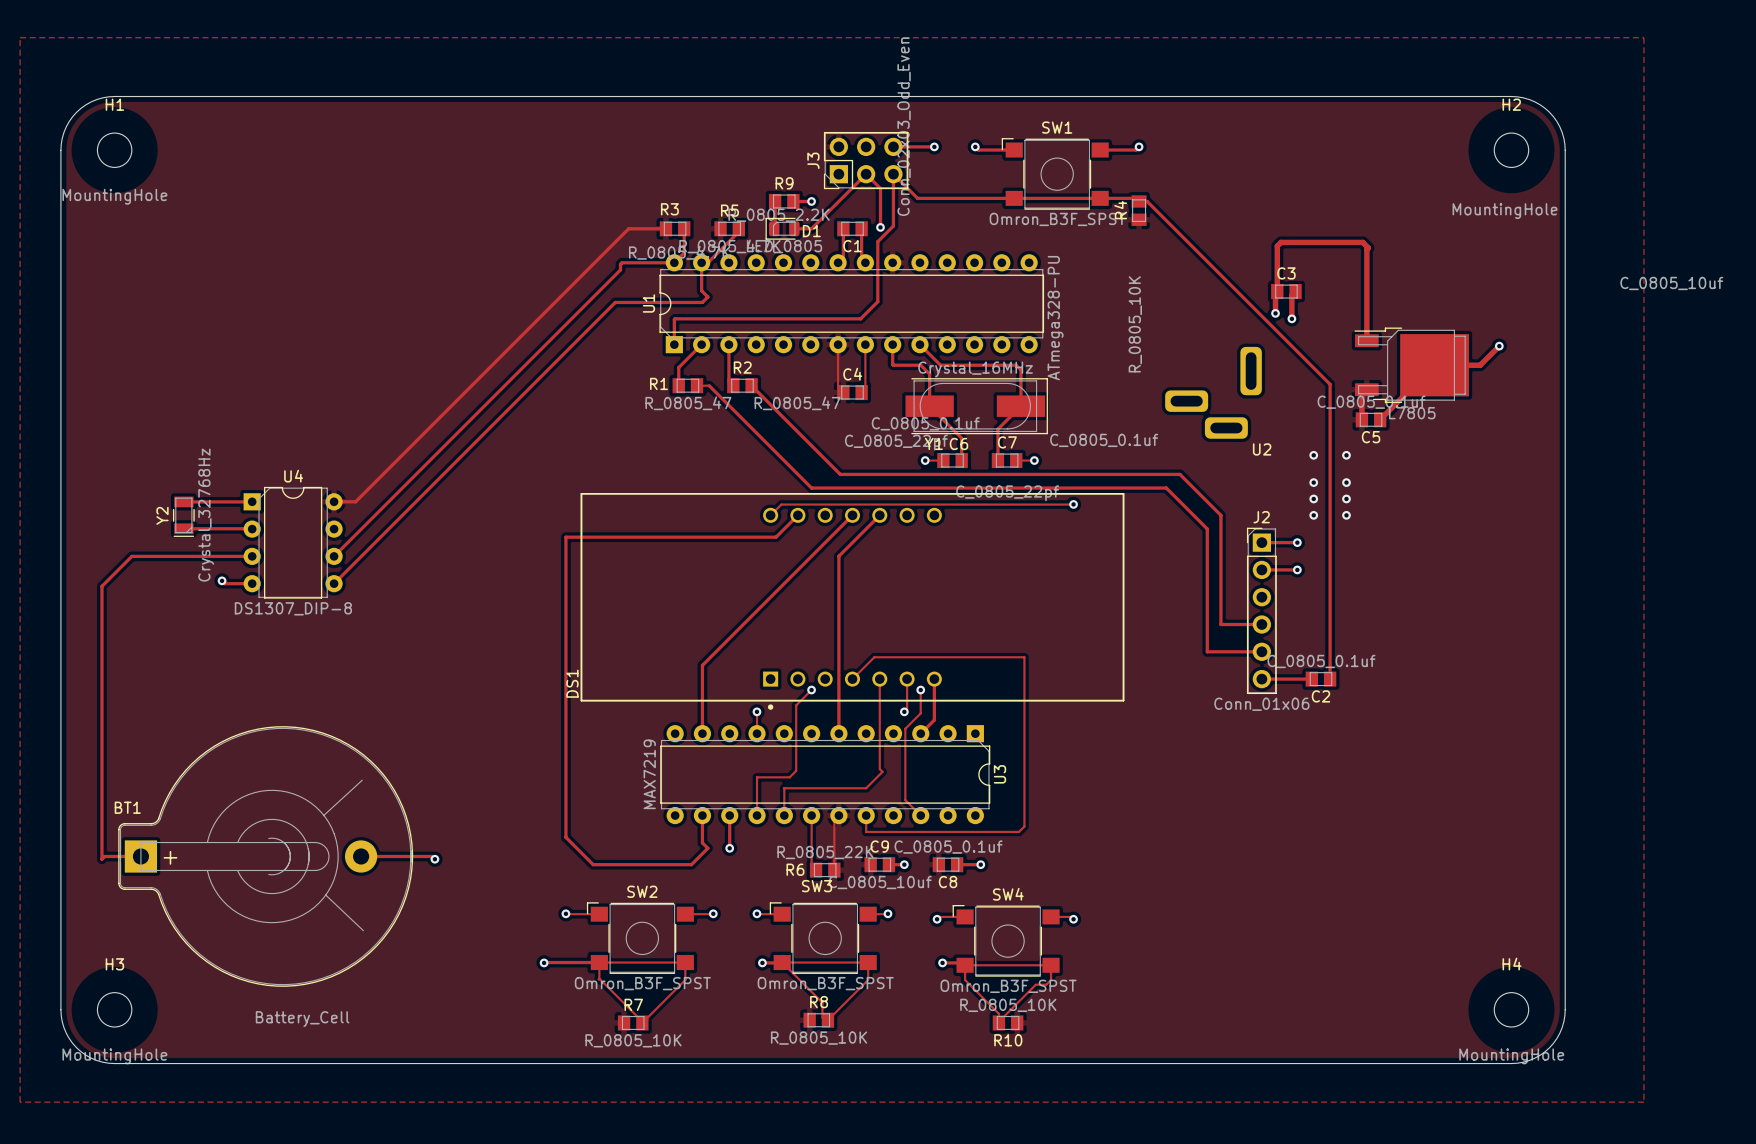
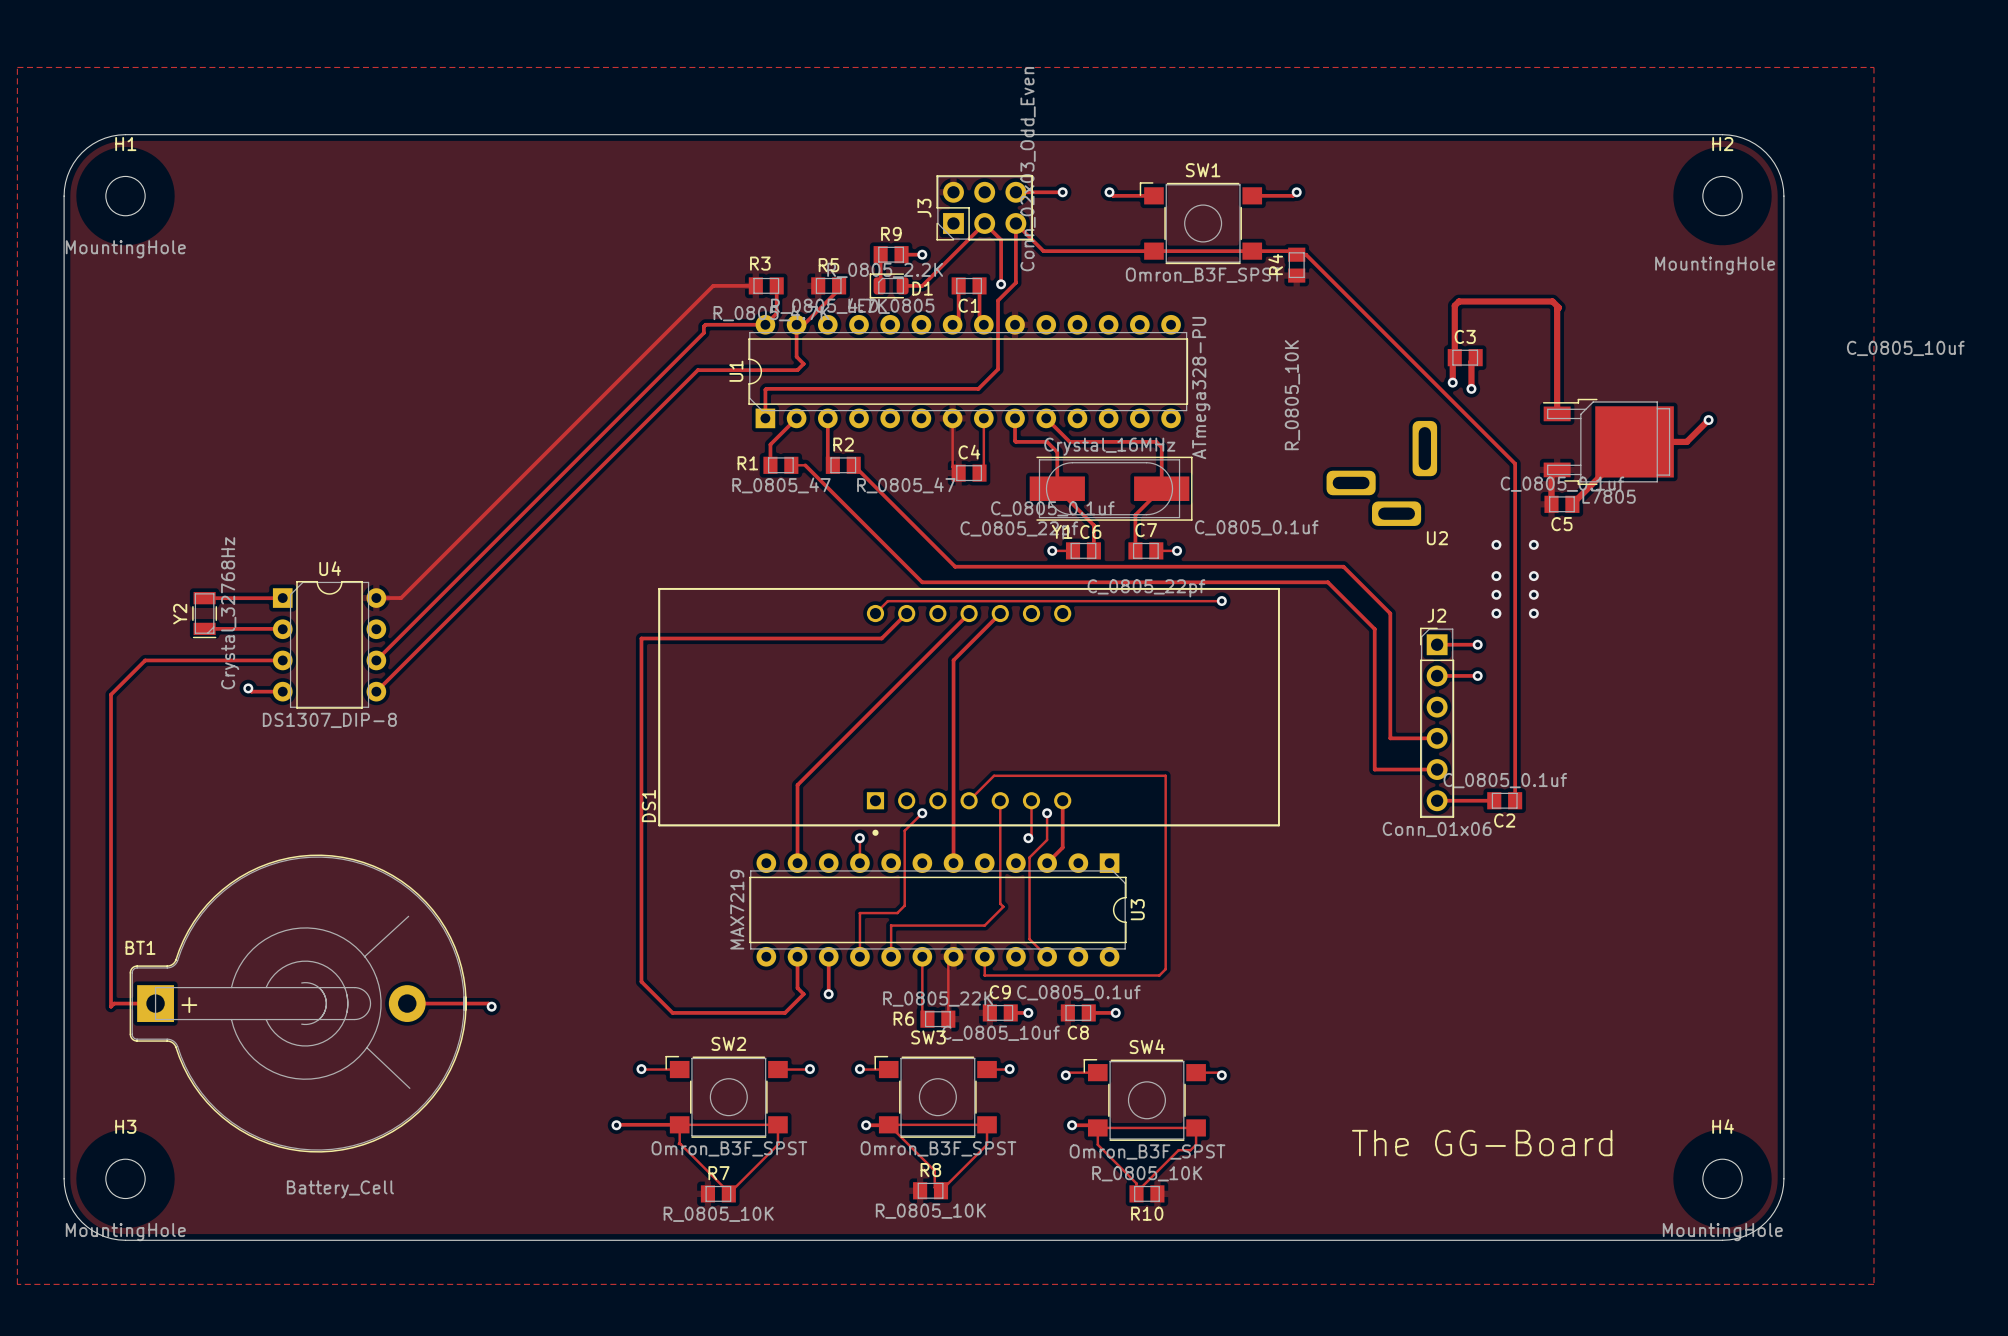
text: none -> The GG-Board (1482, 1143)

